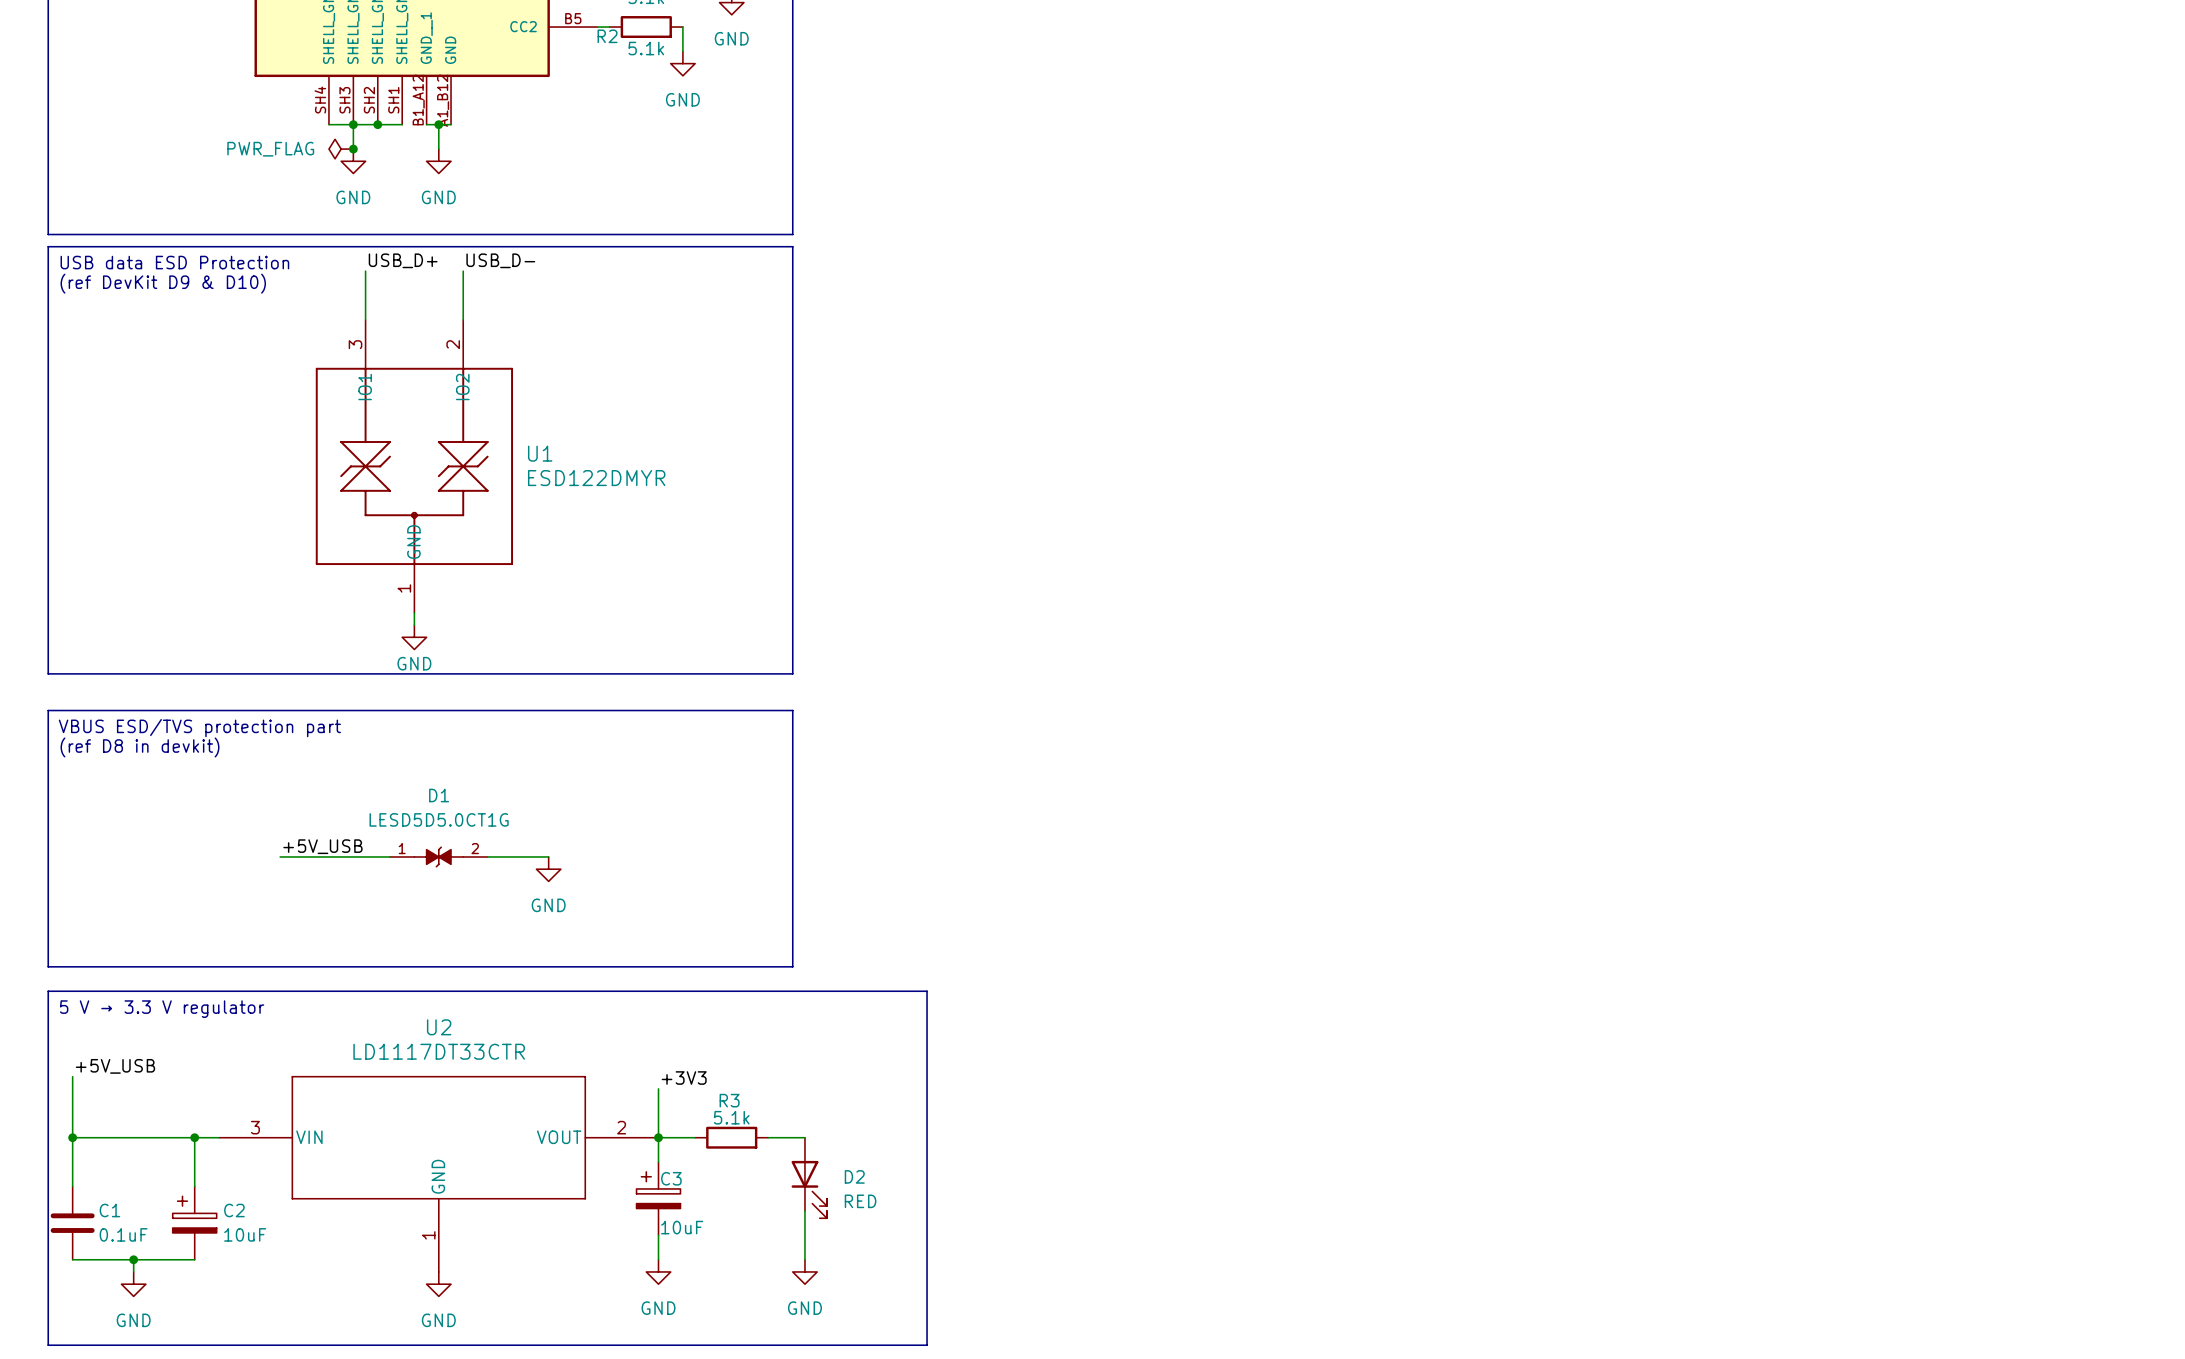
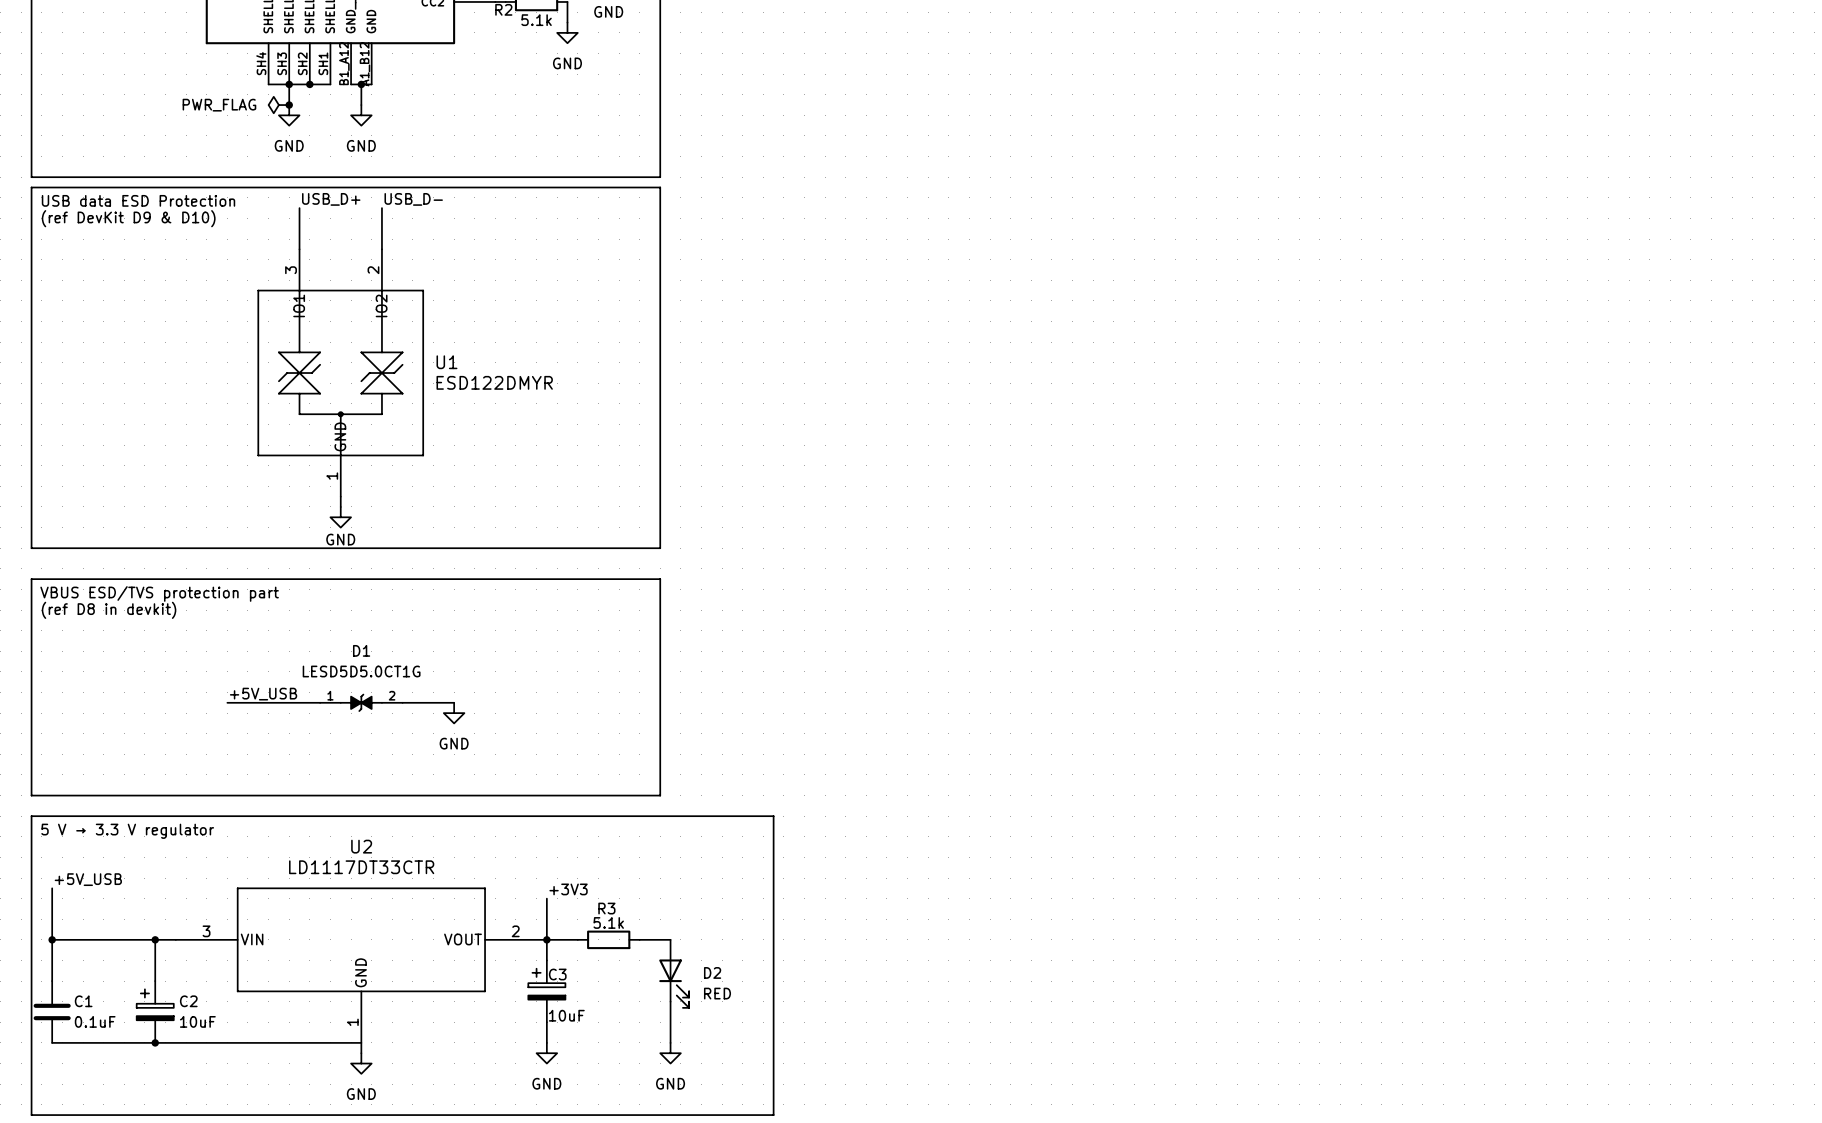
wire: (133, 1259) (133, 1271) -> none
junction: (133, 1259) -> none
wire: none -> (155, 1042) (361, 1042)
junction: none -> (155, 1042)
power symbol: GND (133, 1284) -> none

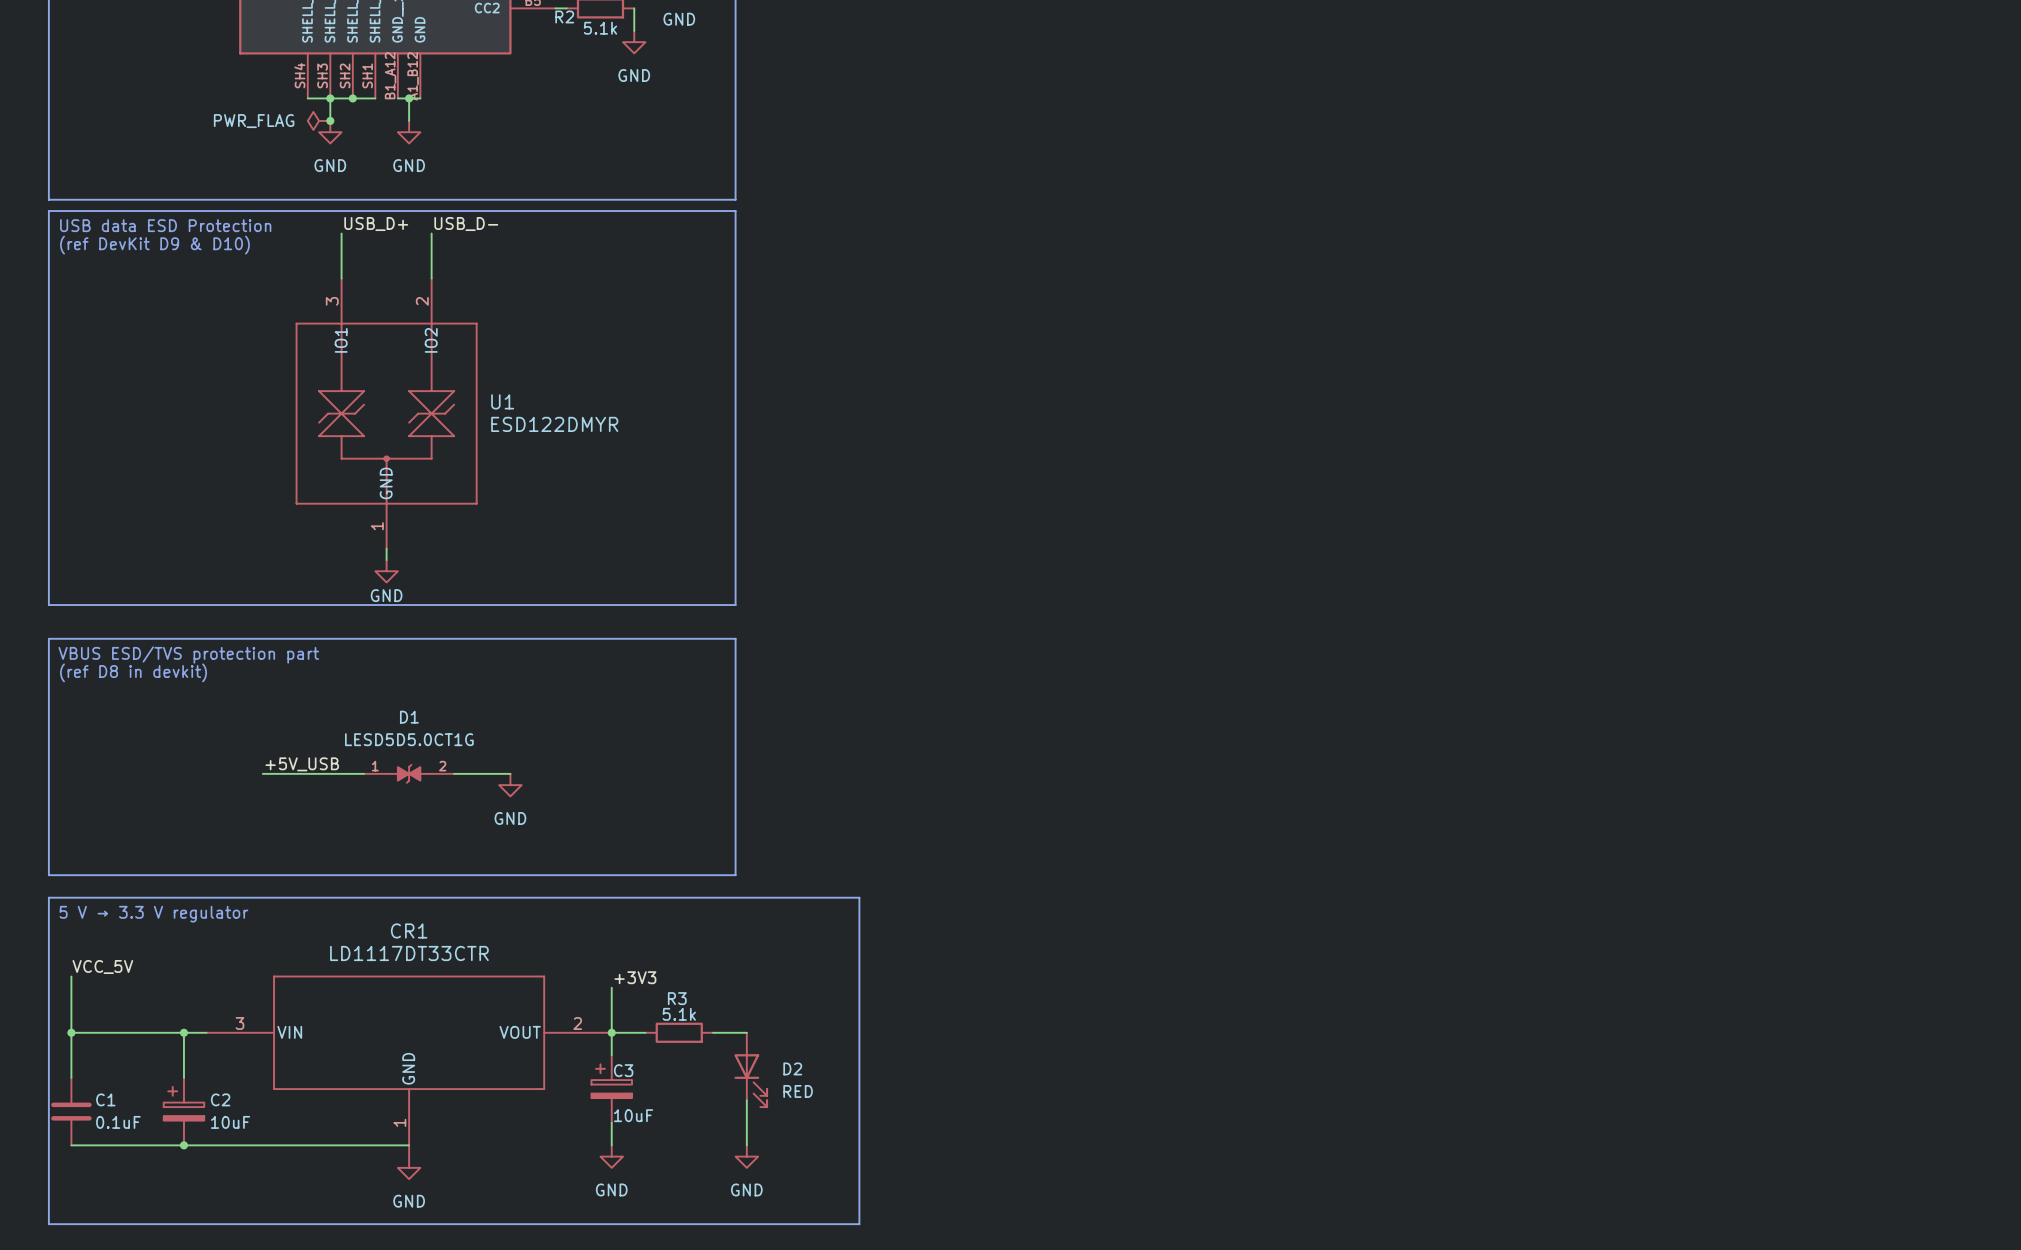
U2 name: U2 (361, 846) -> CR1 (409, 930)
label: +5V_USB (88, 879) -> VCC_5V (102, 966)

